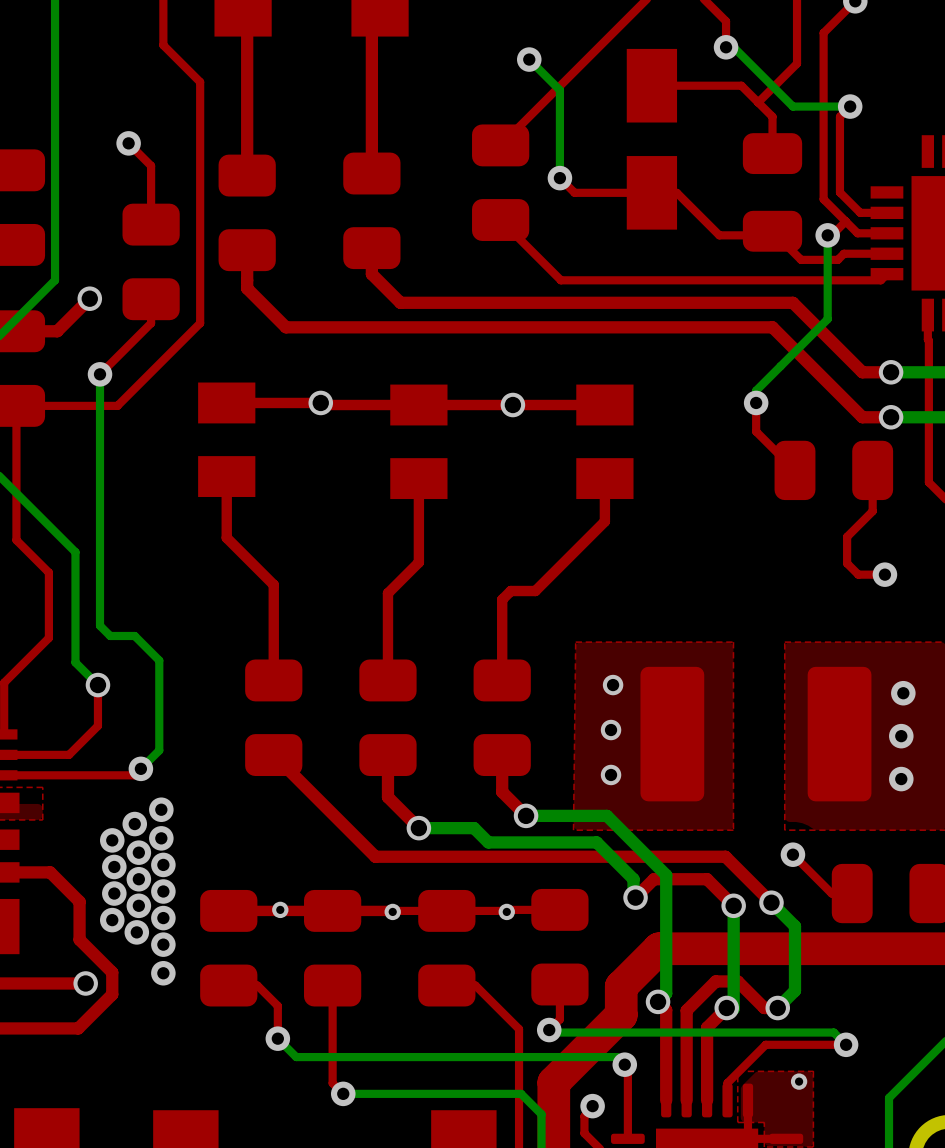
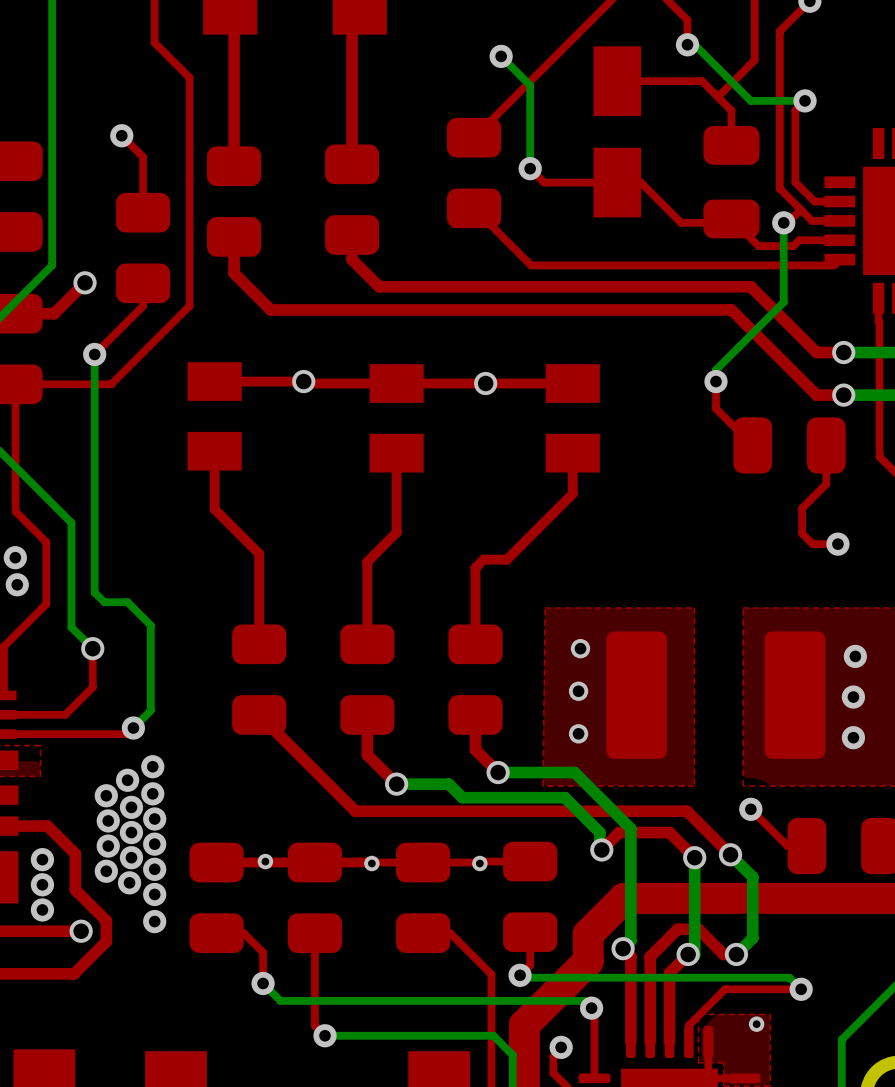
via: none -> (15, 557)
via: none -> (17, 584)
via: none -> (42, 859)
via: none -> (42, 884)
via: none -> (42, 909)

